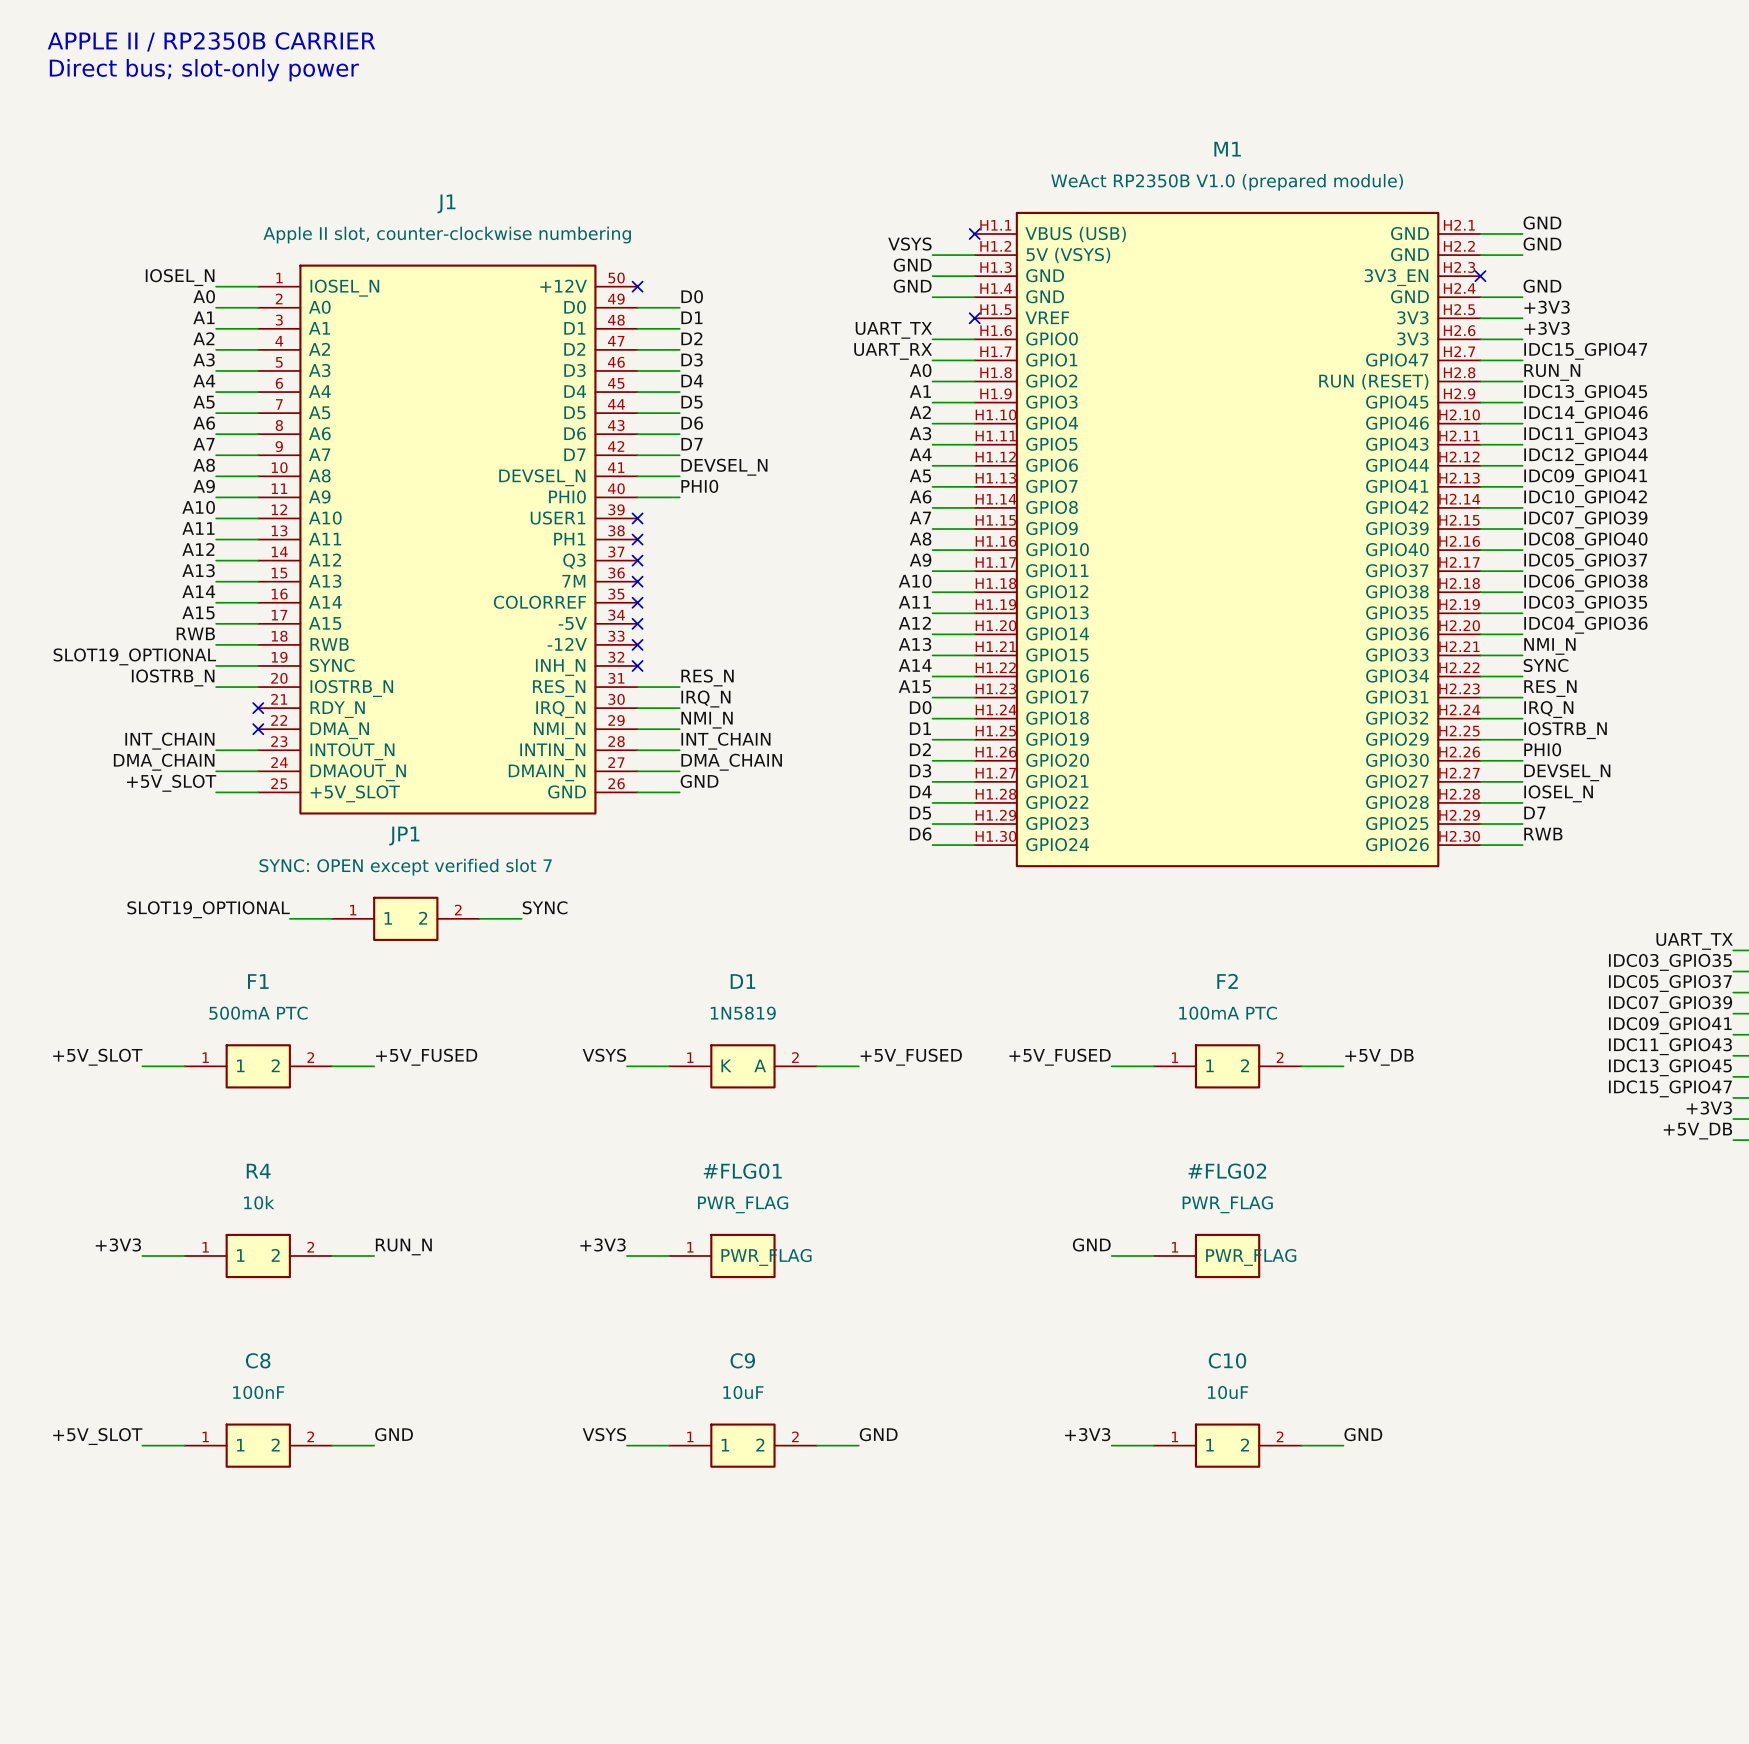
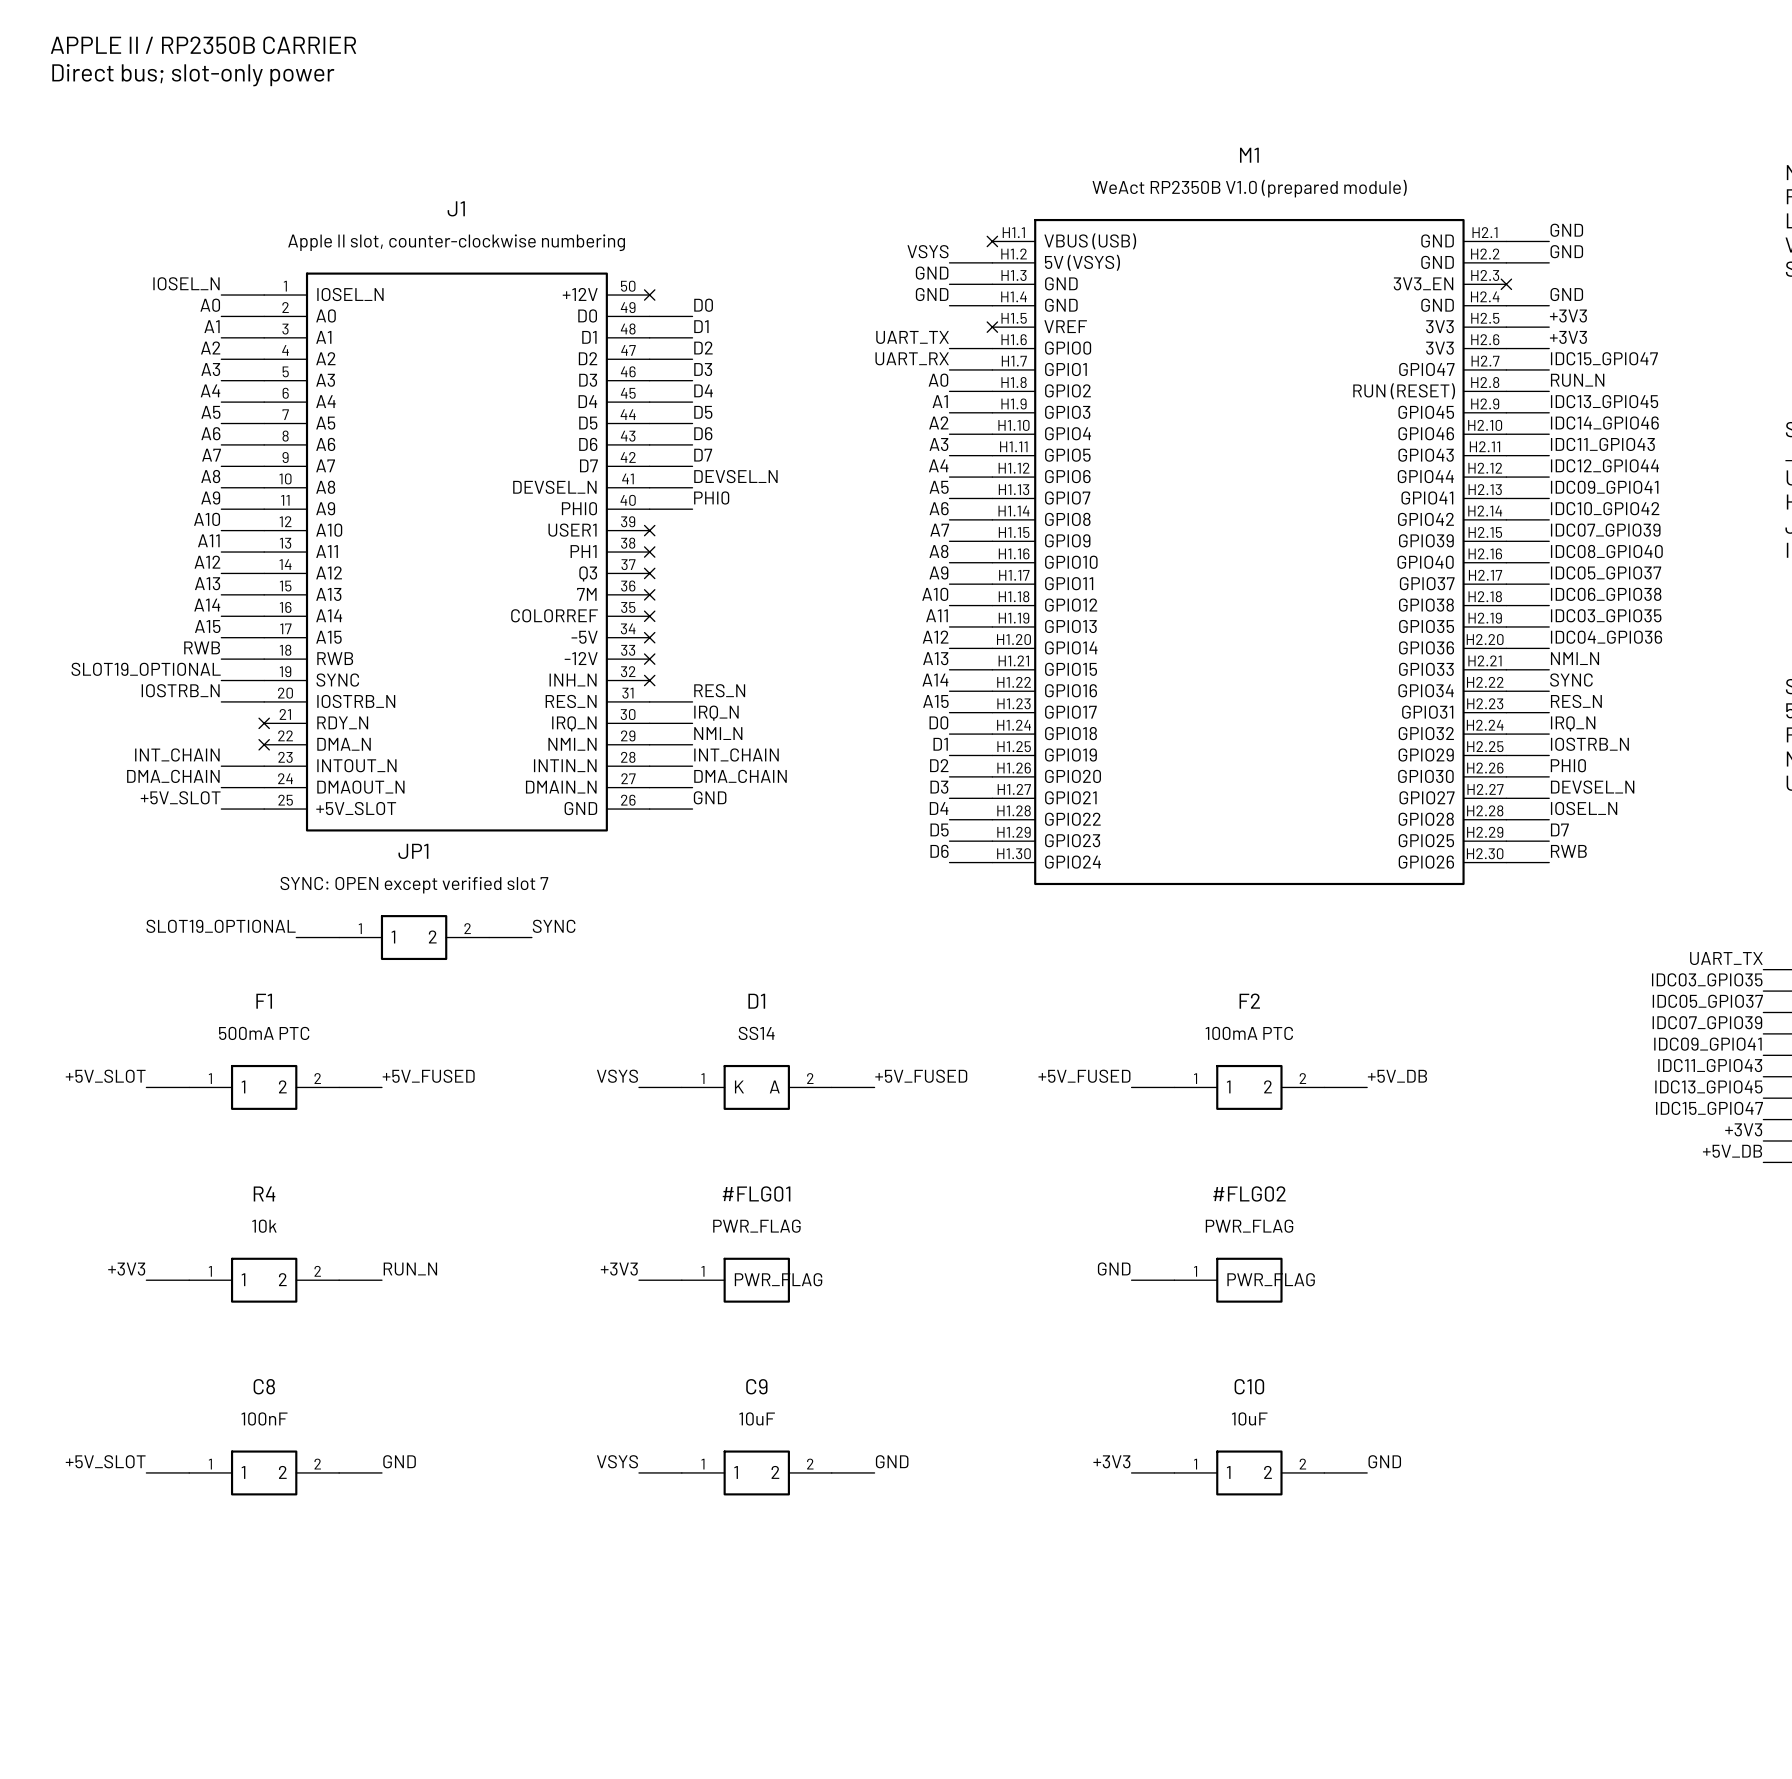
D1 value: 1N5819 (743, 1013) -> SS14 (756, 1033)

